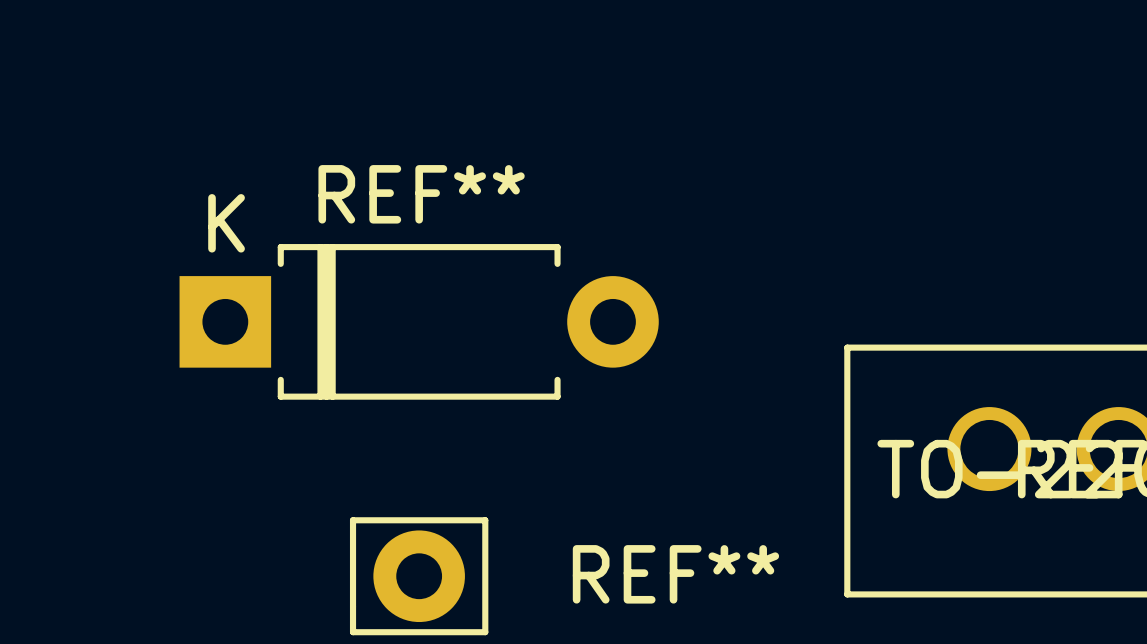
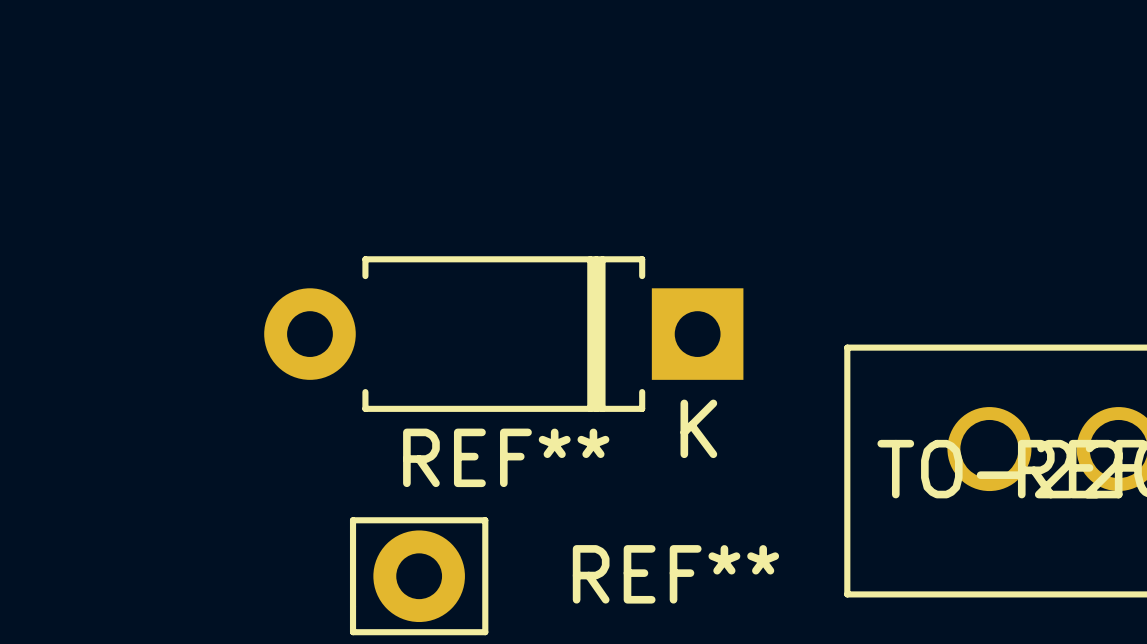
REF** rotation: 0° (419, 321) -> 180° (503, 334)

